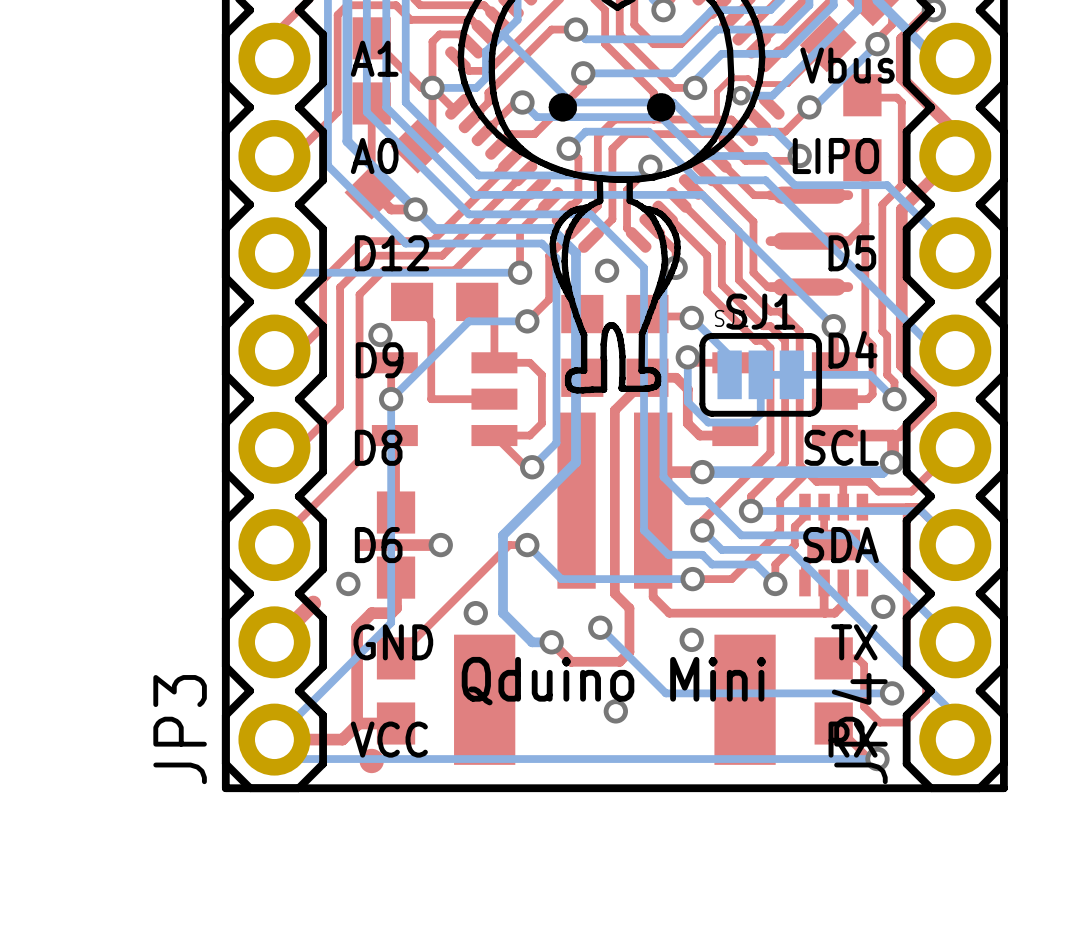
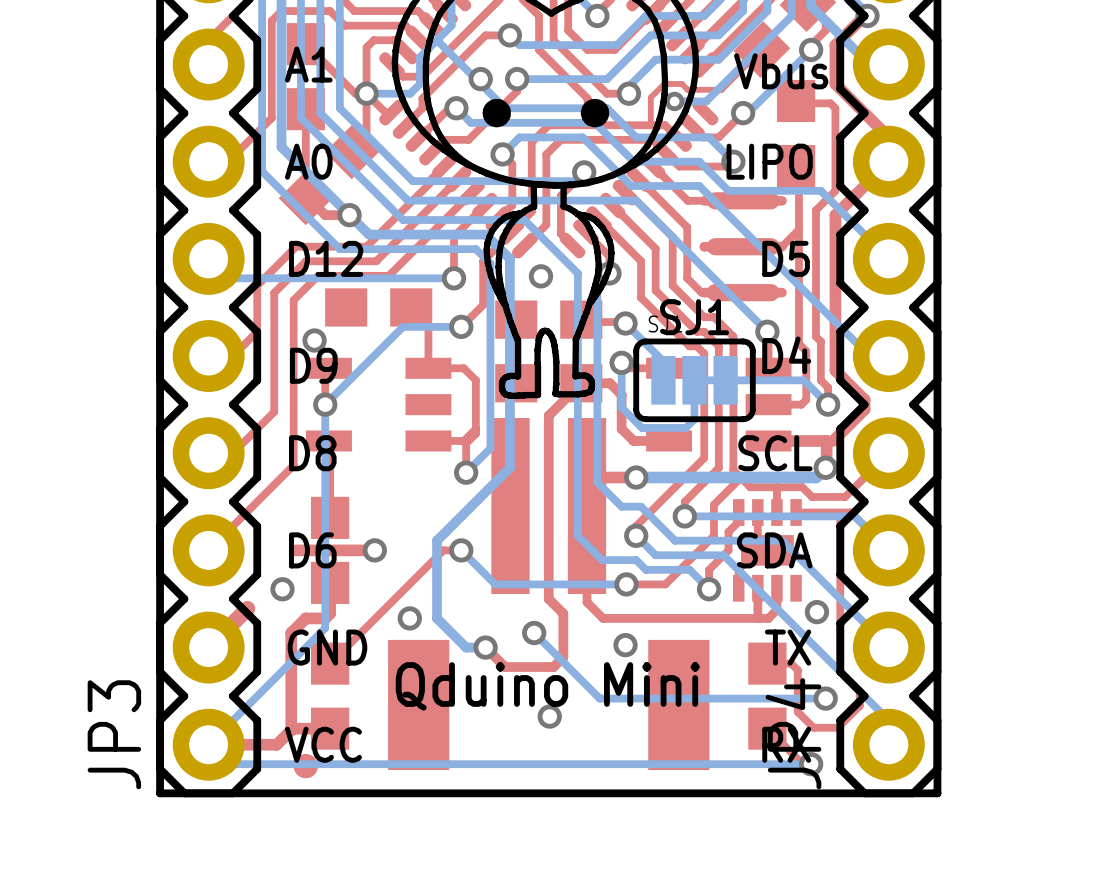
via: none -> (480, 79)
top track: (412, 301) (431, 321) (431, 399) (494, 399) -> none
top track: (494, 435) (526, 467) (532, 467) -> (475, 428) (475, 433) (466, 443) (466, 472)

